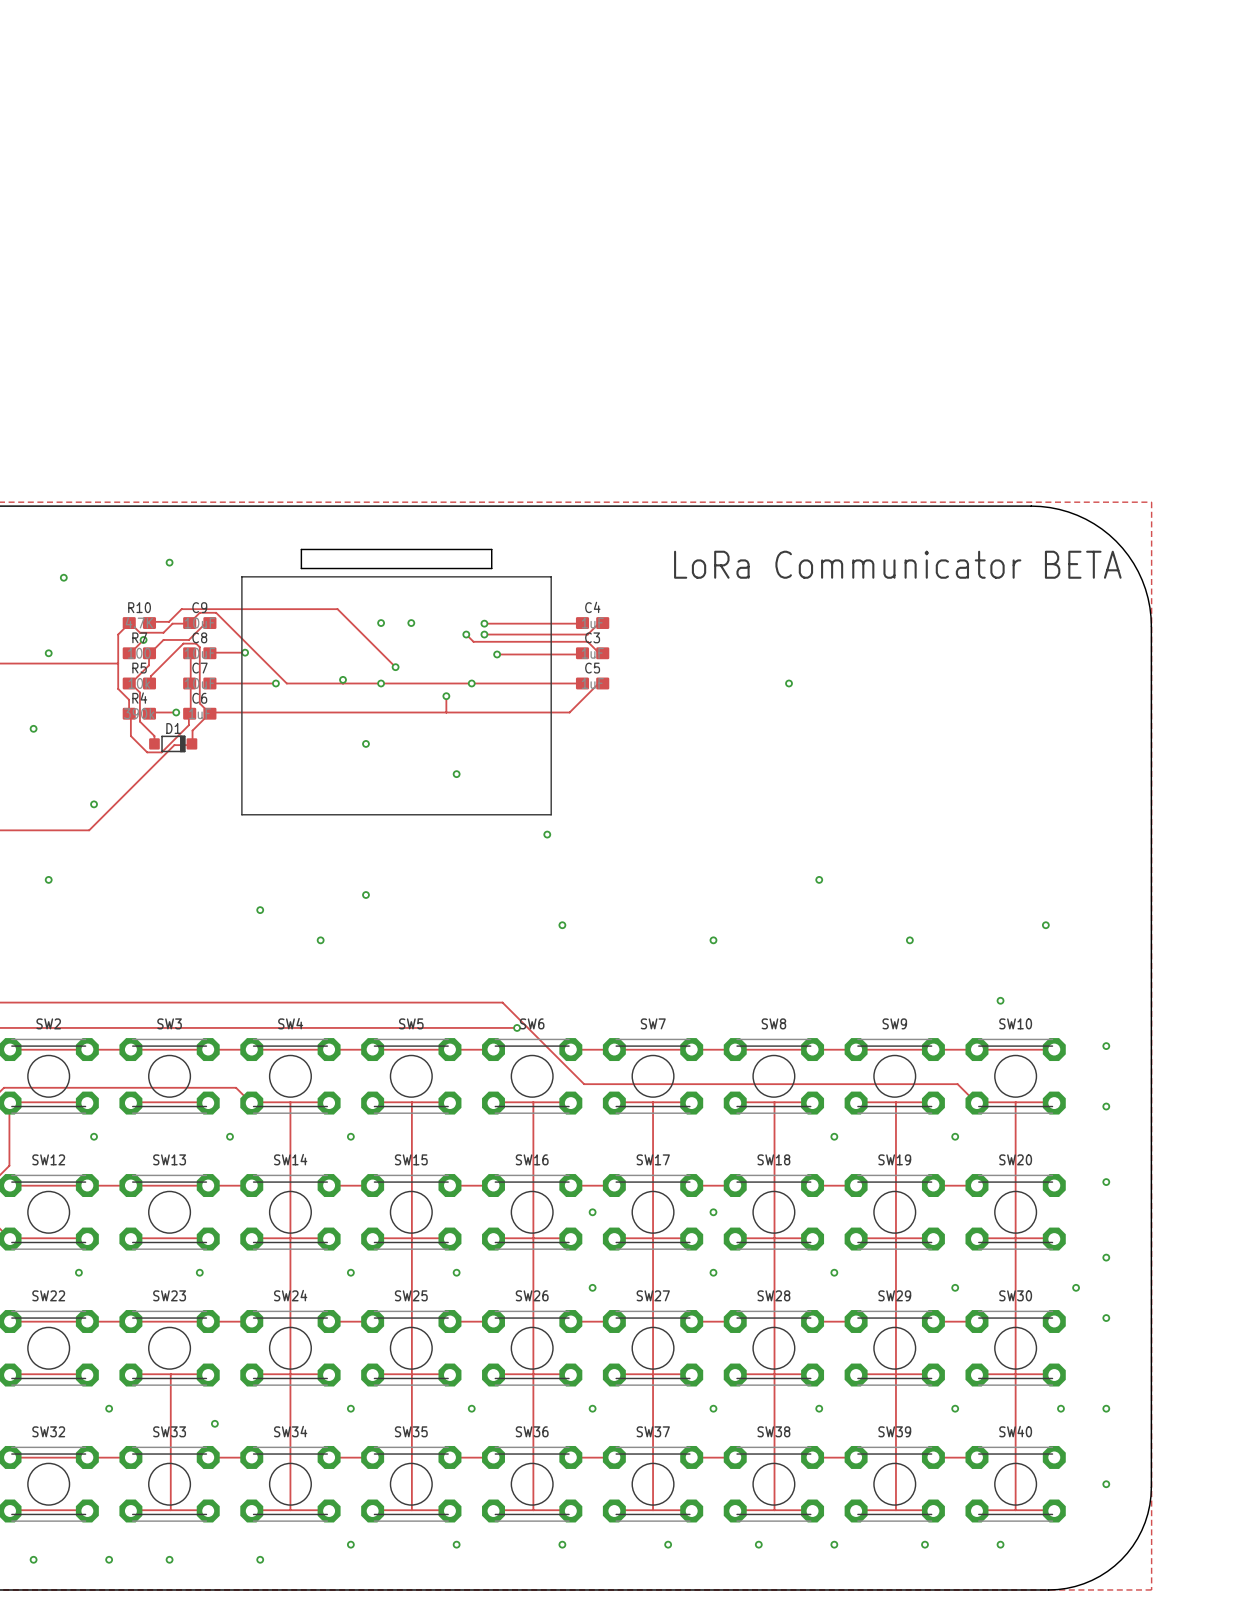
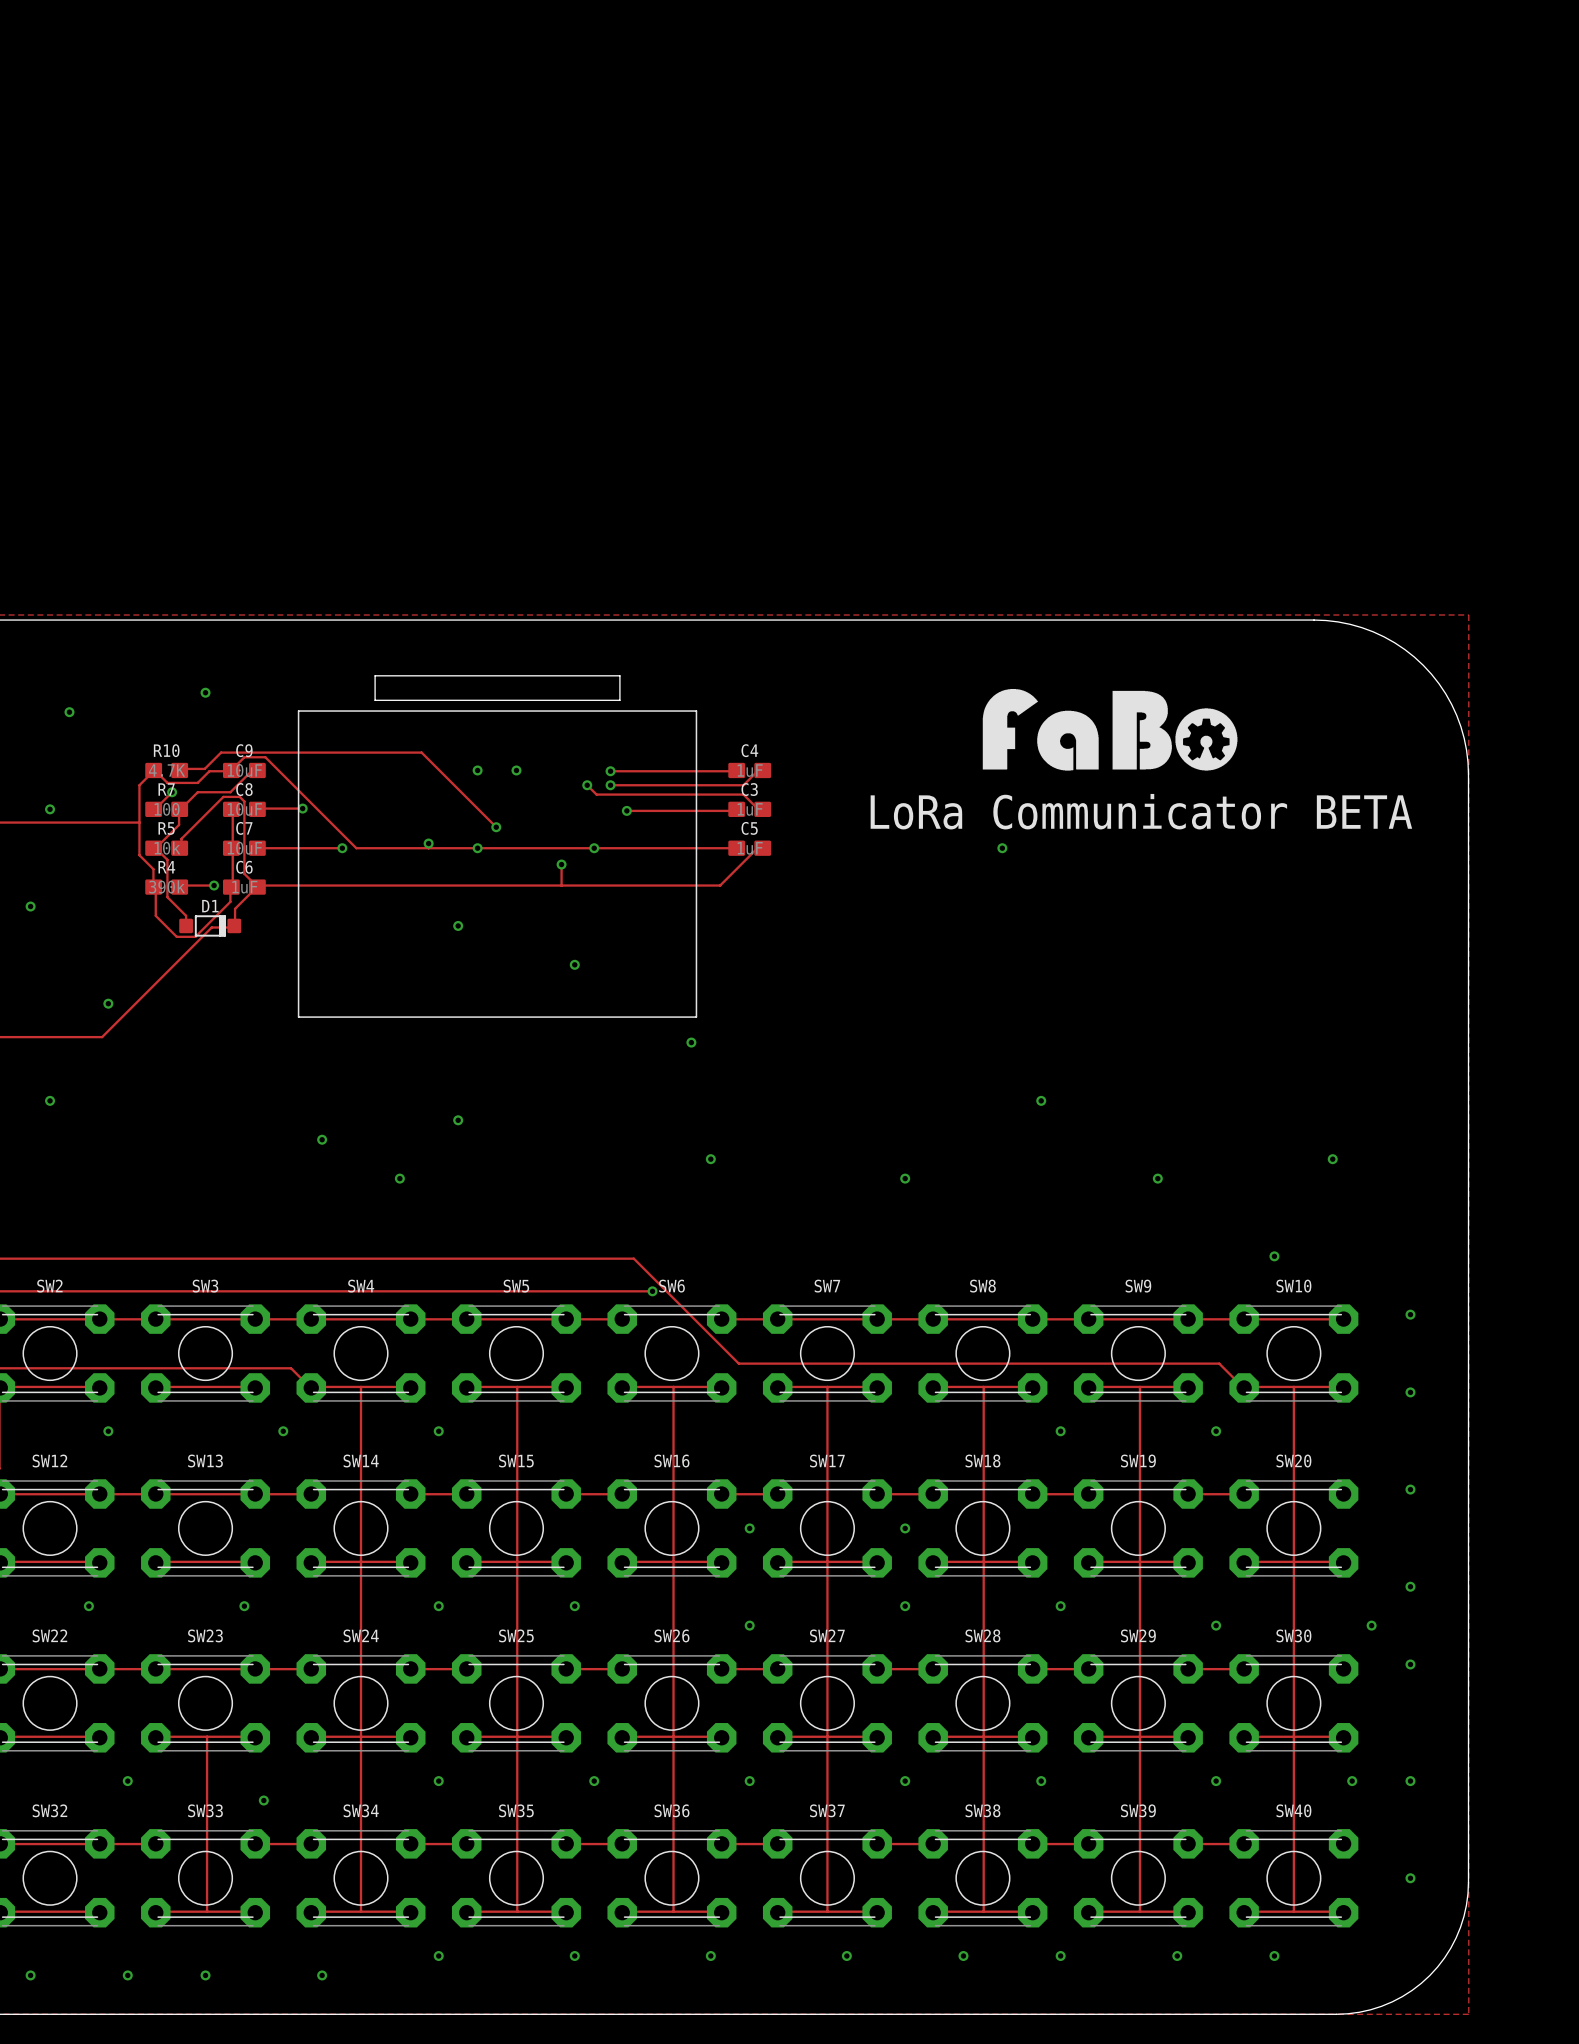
drawing: none -> [982, 688, 1238, 771]
text position: LoRa Communicator BETA (897, 564) -> LoRa Communicator BETA (1141, 811)

